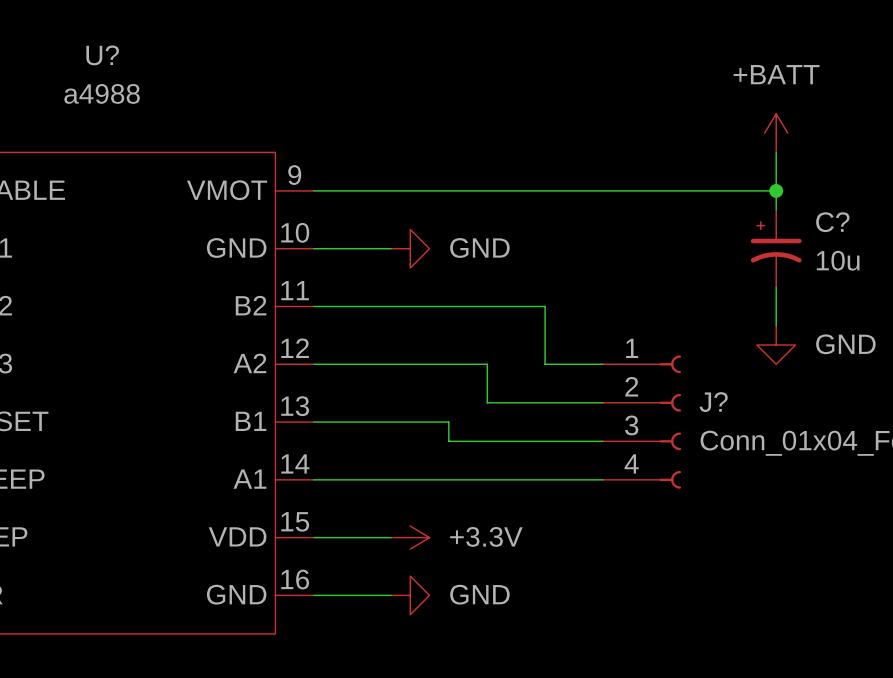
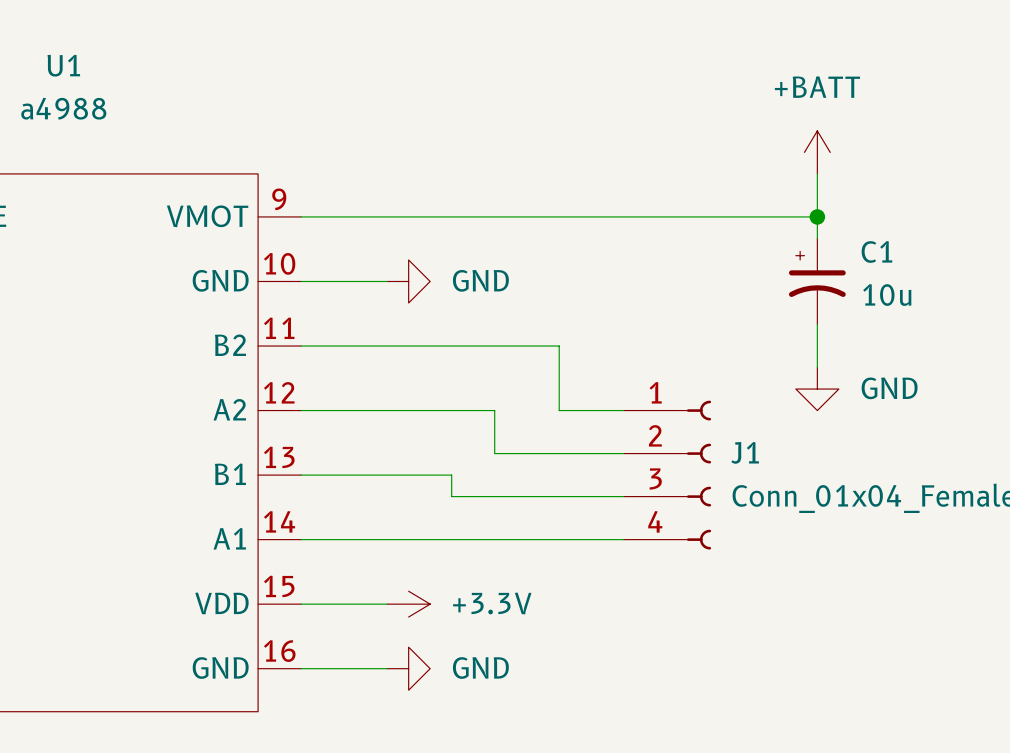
U? name: U? (102, 55) -> U1 (63, 65)
C? name: C? (832, 222) -> C1 (876, 251)
J? name: J? (713, 402) -> J1 (745, 452)

